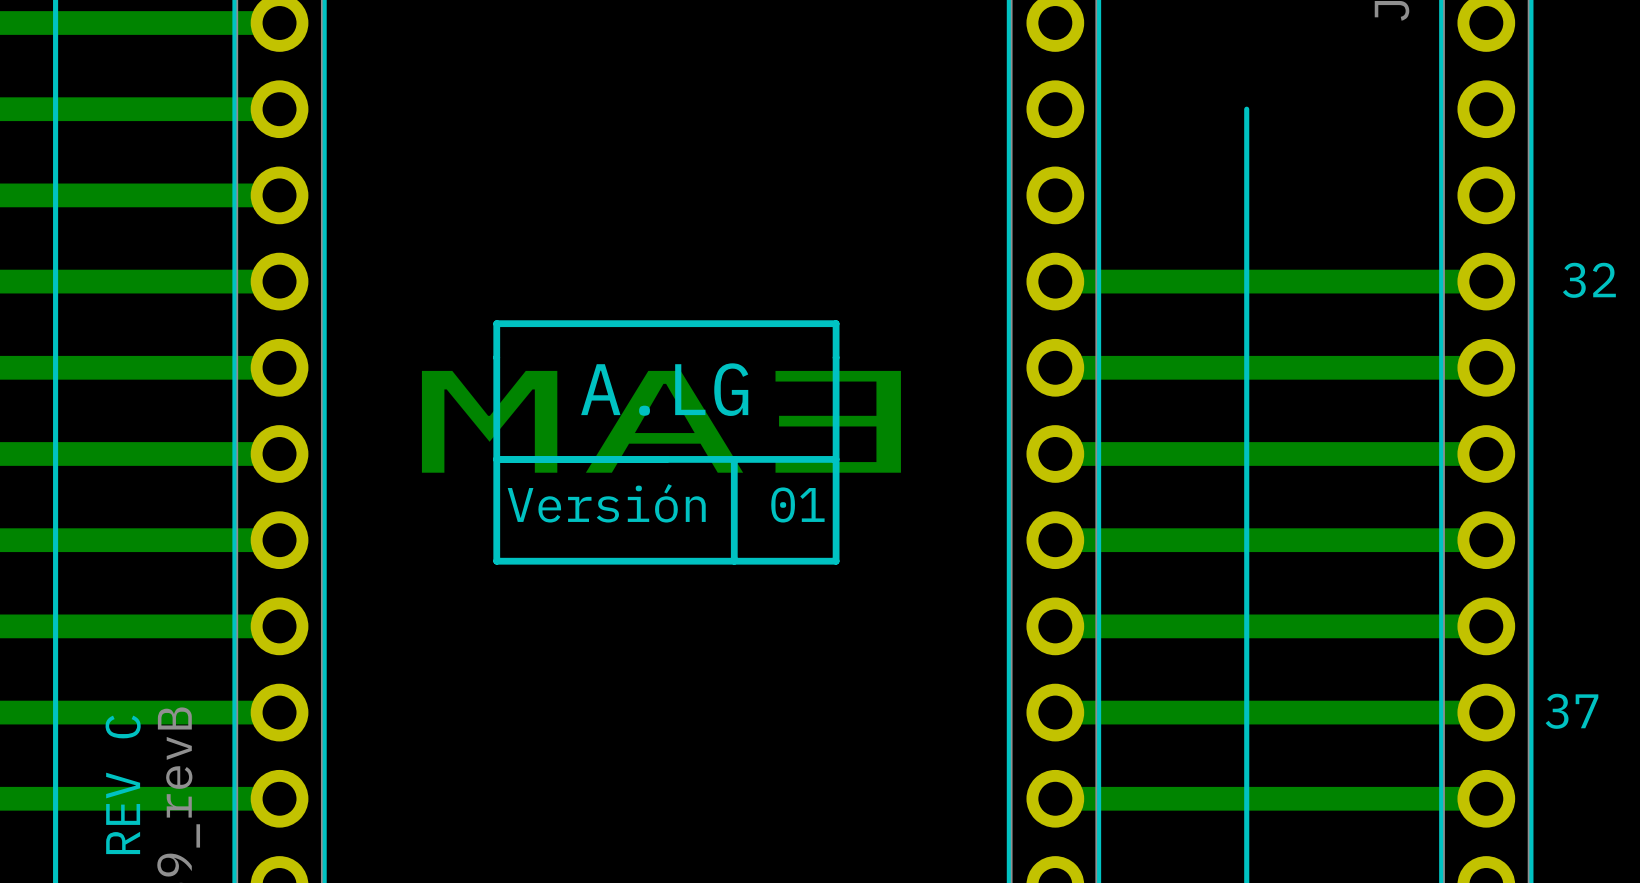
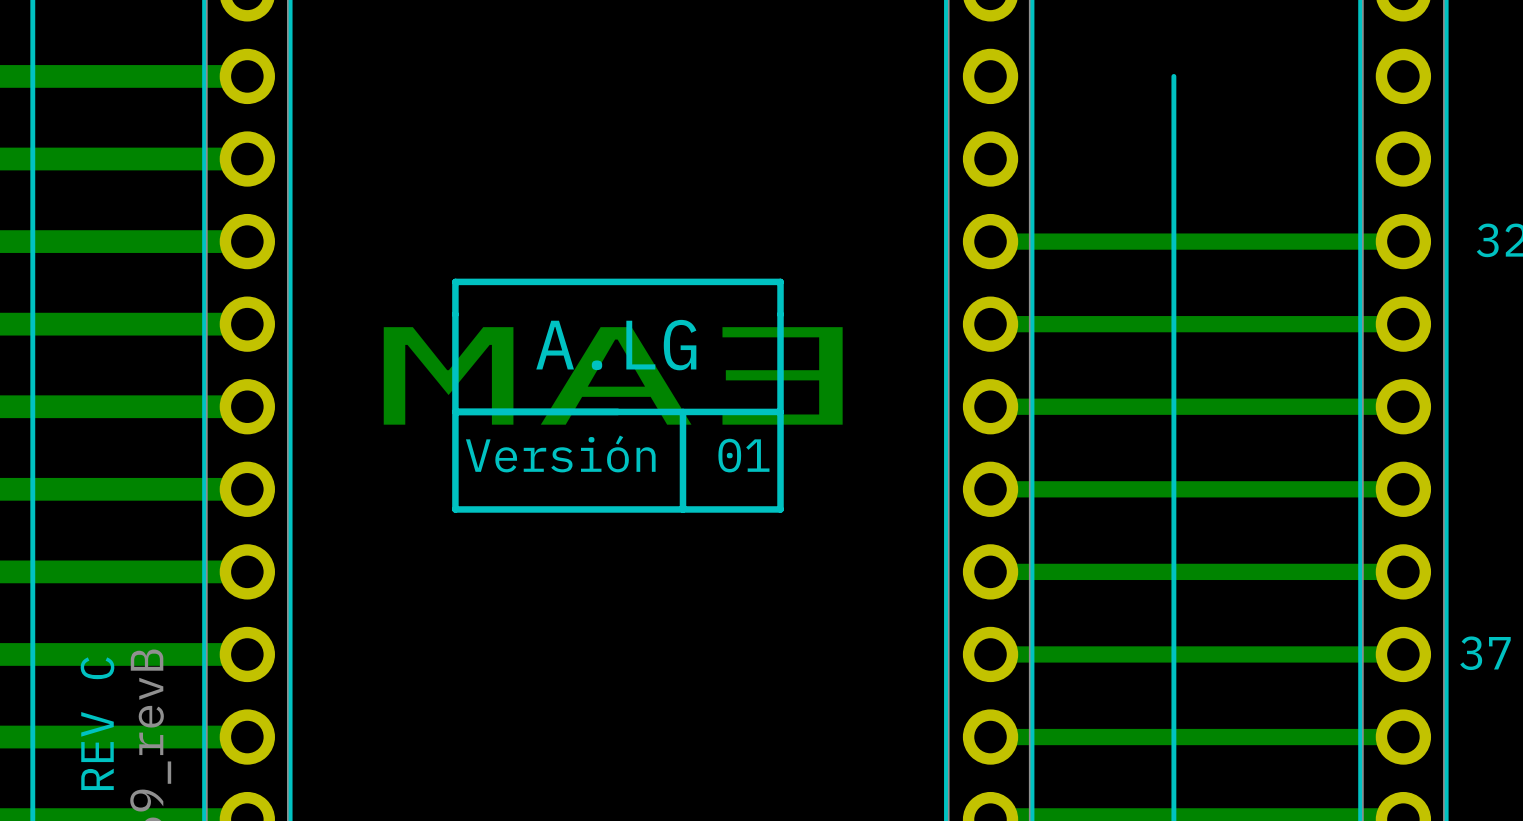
bottom track width: thick (1055, 281) (1486, 281) -> thin (990, 241) (1403, 241)
bottom track width: thick (1055, 367) (1486, 367) -> thin (990, 324) (1403, 324)
bottom track width: thick (1055, 453) (1486, 453) -> thin (990, 406) (1403, 406)
bottom track width: thick (1055, 540) (1486, 540) -> thin (990, 489) (1403, 489)
bottom track width: thick (1055, 626) (1486, 626) -> thin (990, 571) (1403, 571)
bottom track width: thick (1055, 712) (1486, 712) -> thin (990, 654) (1403, 654)
bottom track width: thick (1055, 798) (1486, 798) -> thin (990, 737) (1403, 737)

